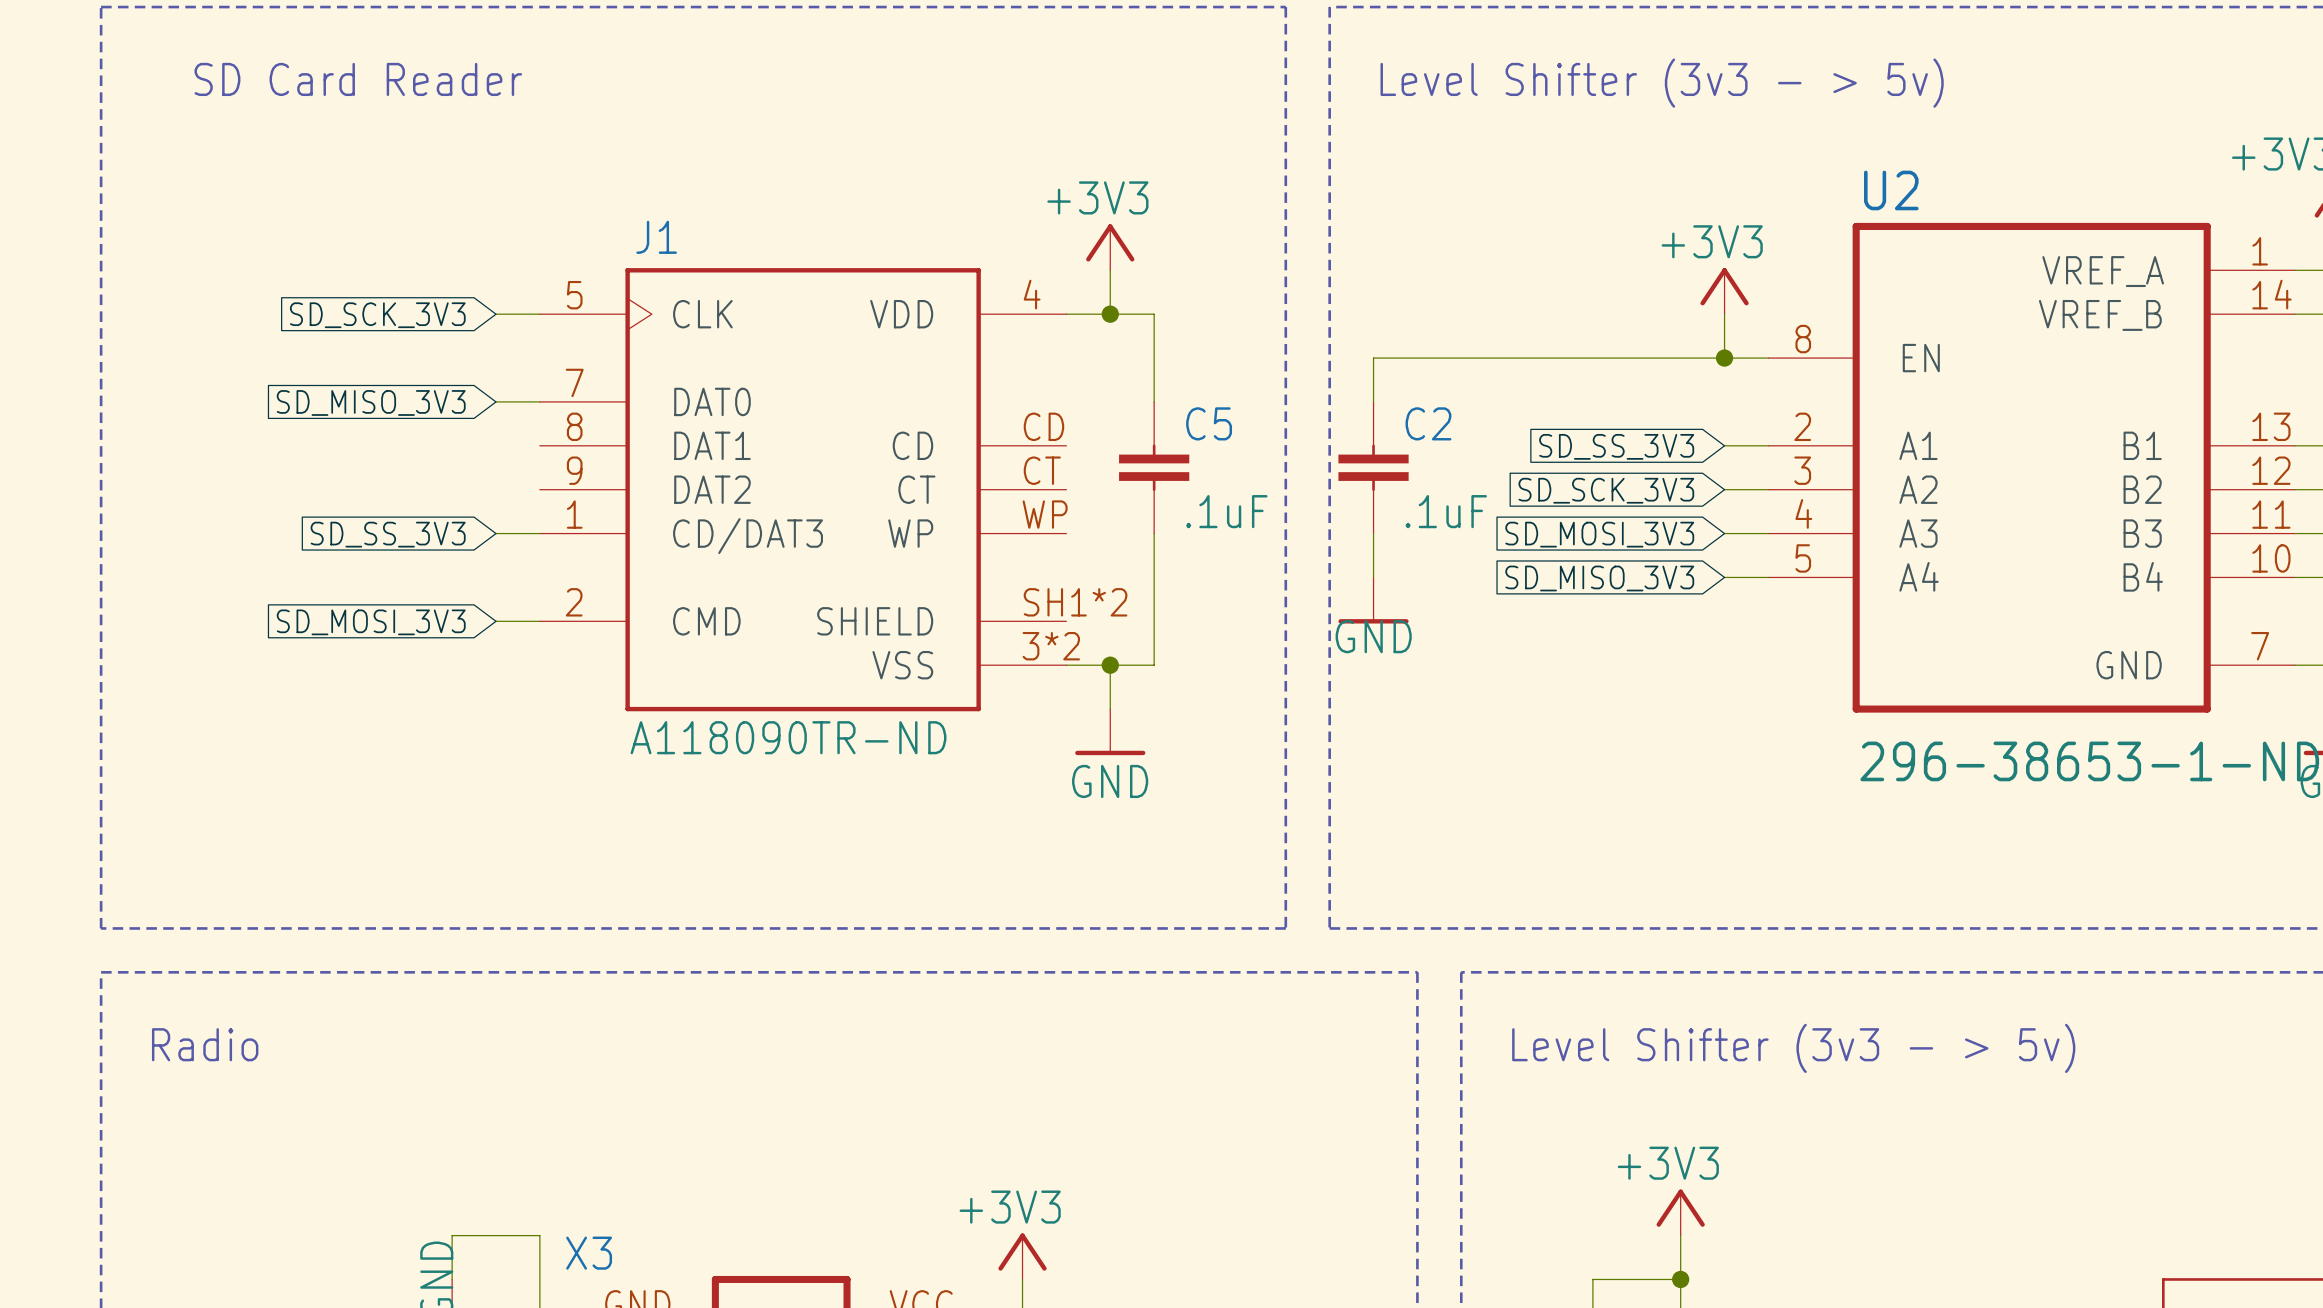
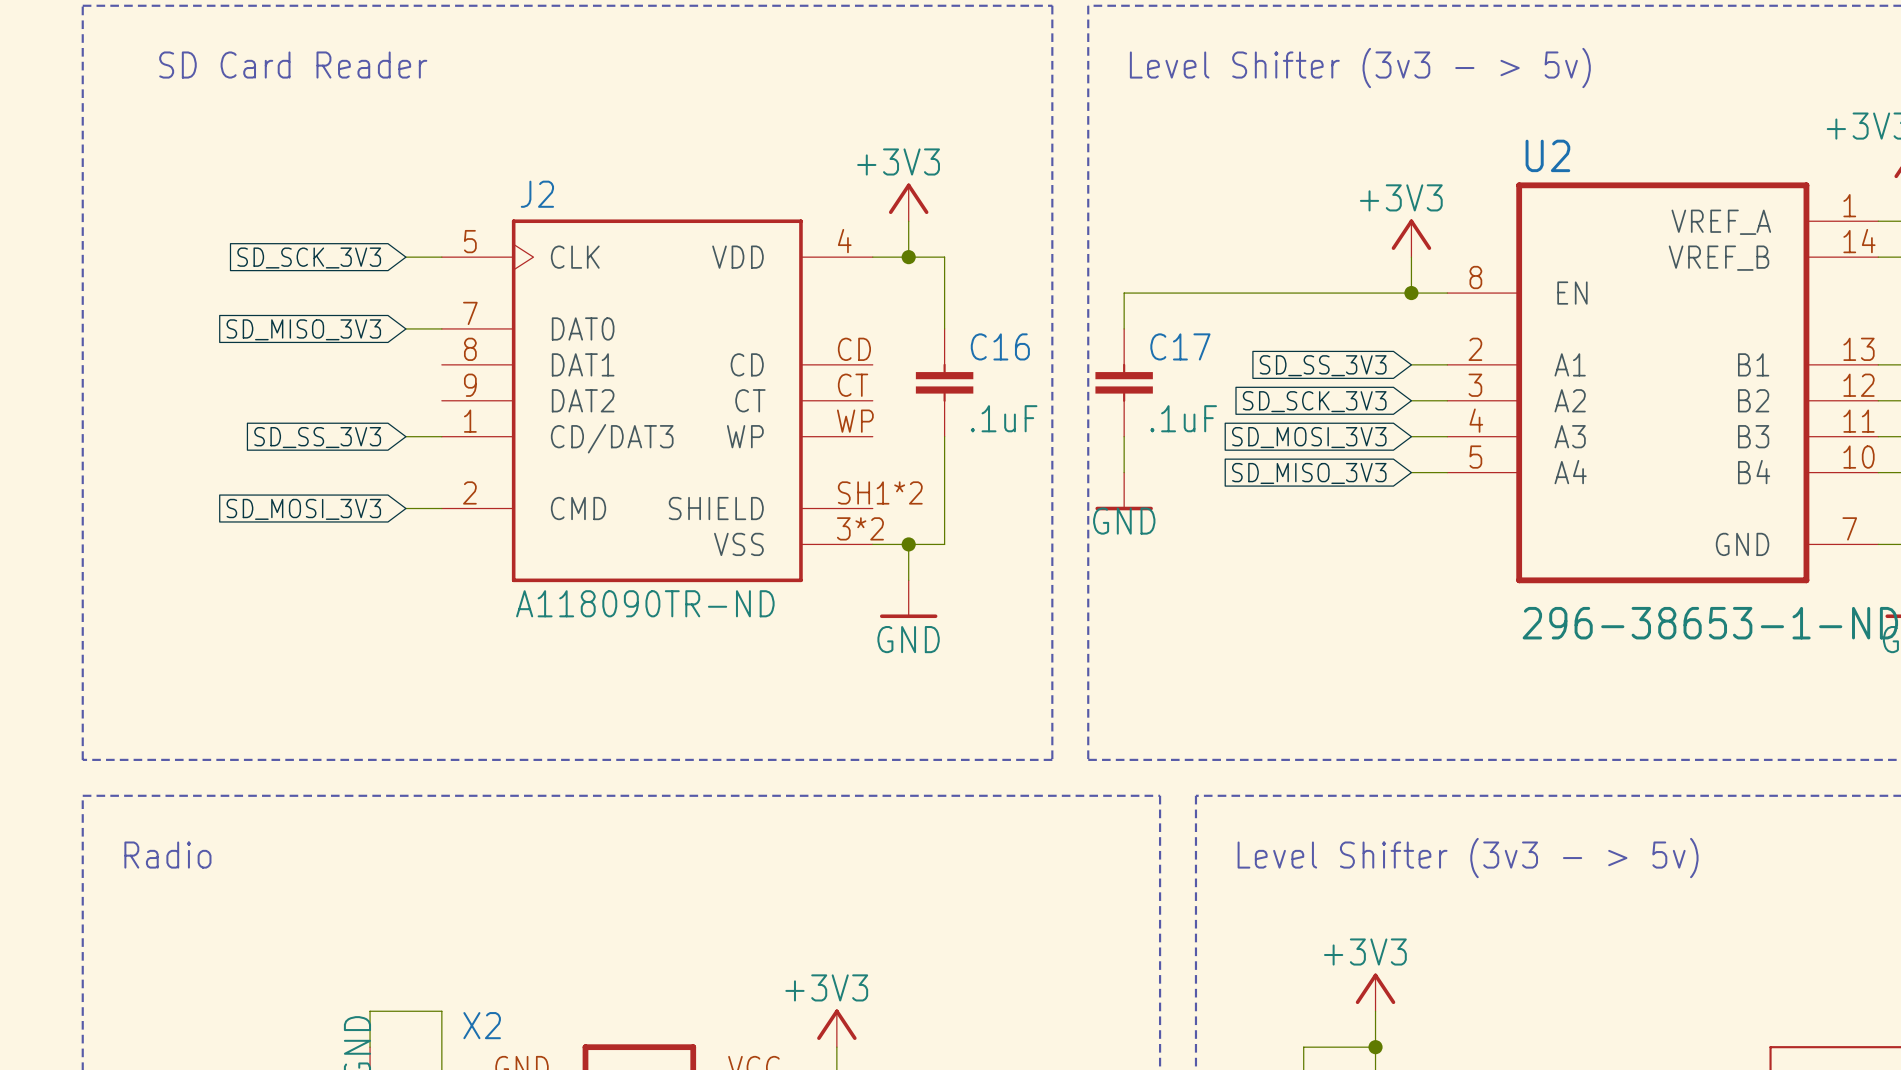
J1 name: J1 (656, 237) -> J2 (537, 194)
C5 name: C5 (1209, 423) -> C16 (1000, 346)
C2 name: C2 (1428, 423) -> C17 (1180, 346)
X3 name: X3 (589, 1253) -> X2 (482, 1025)

